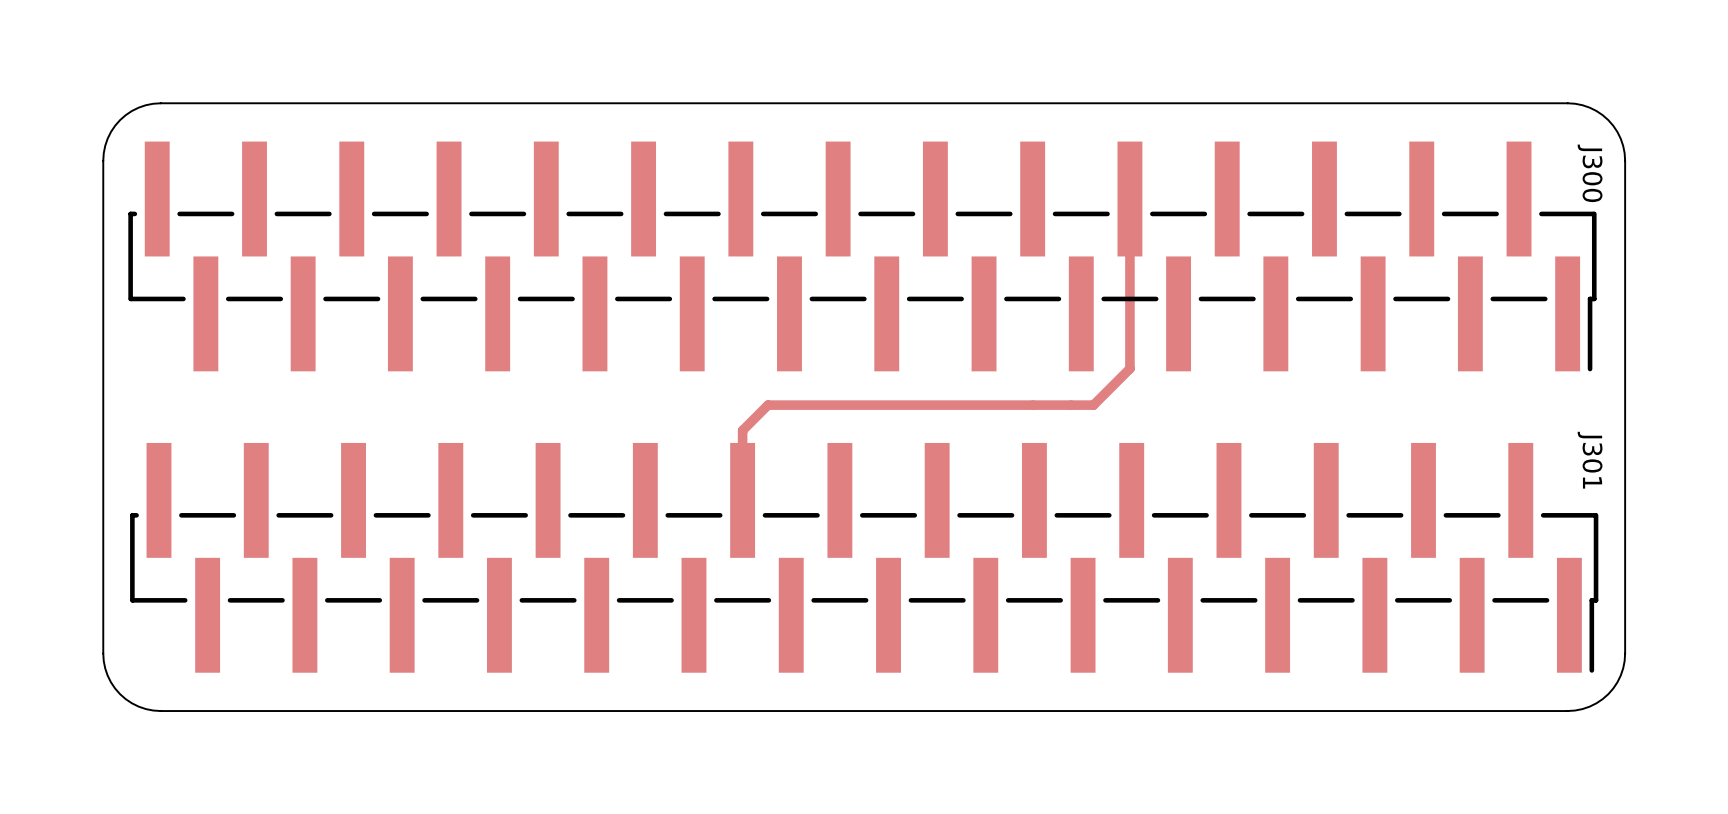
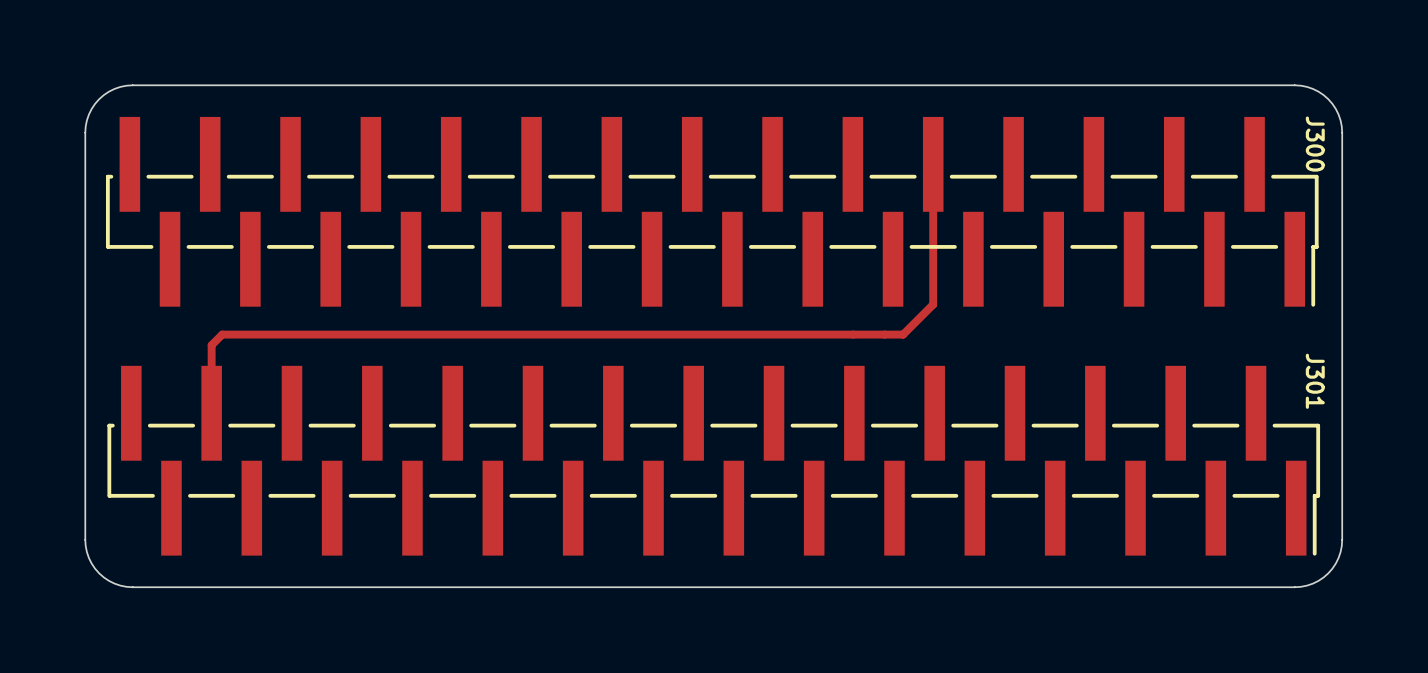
track: (768, 405) (742, 430) (742, 500) -> (634, 334) (222, 334) (211, 345) (211, 413)

